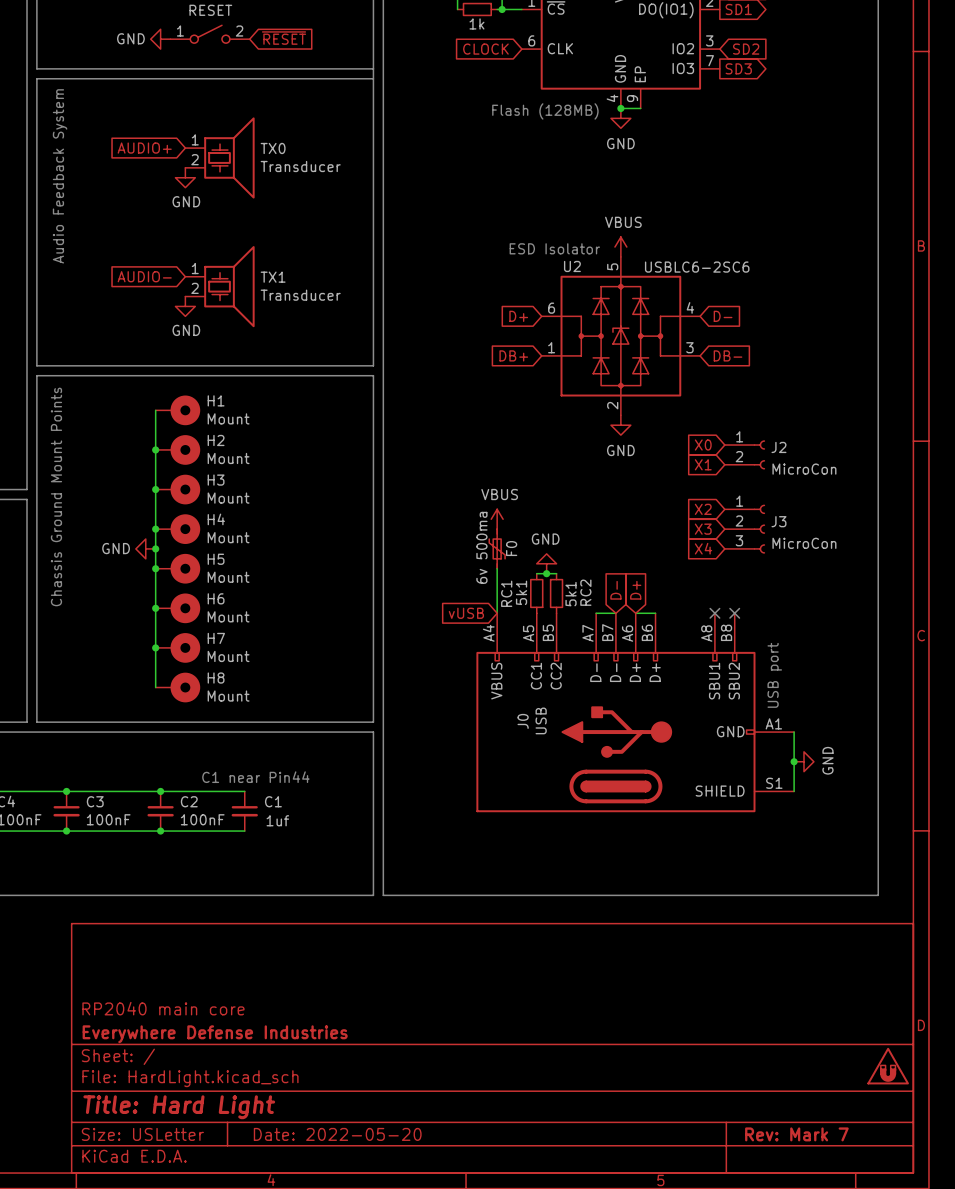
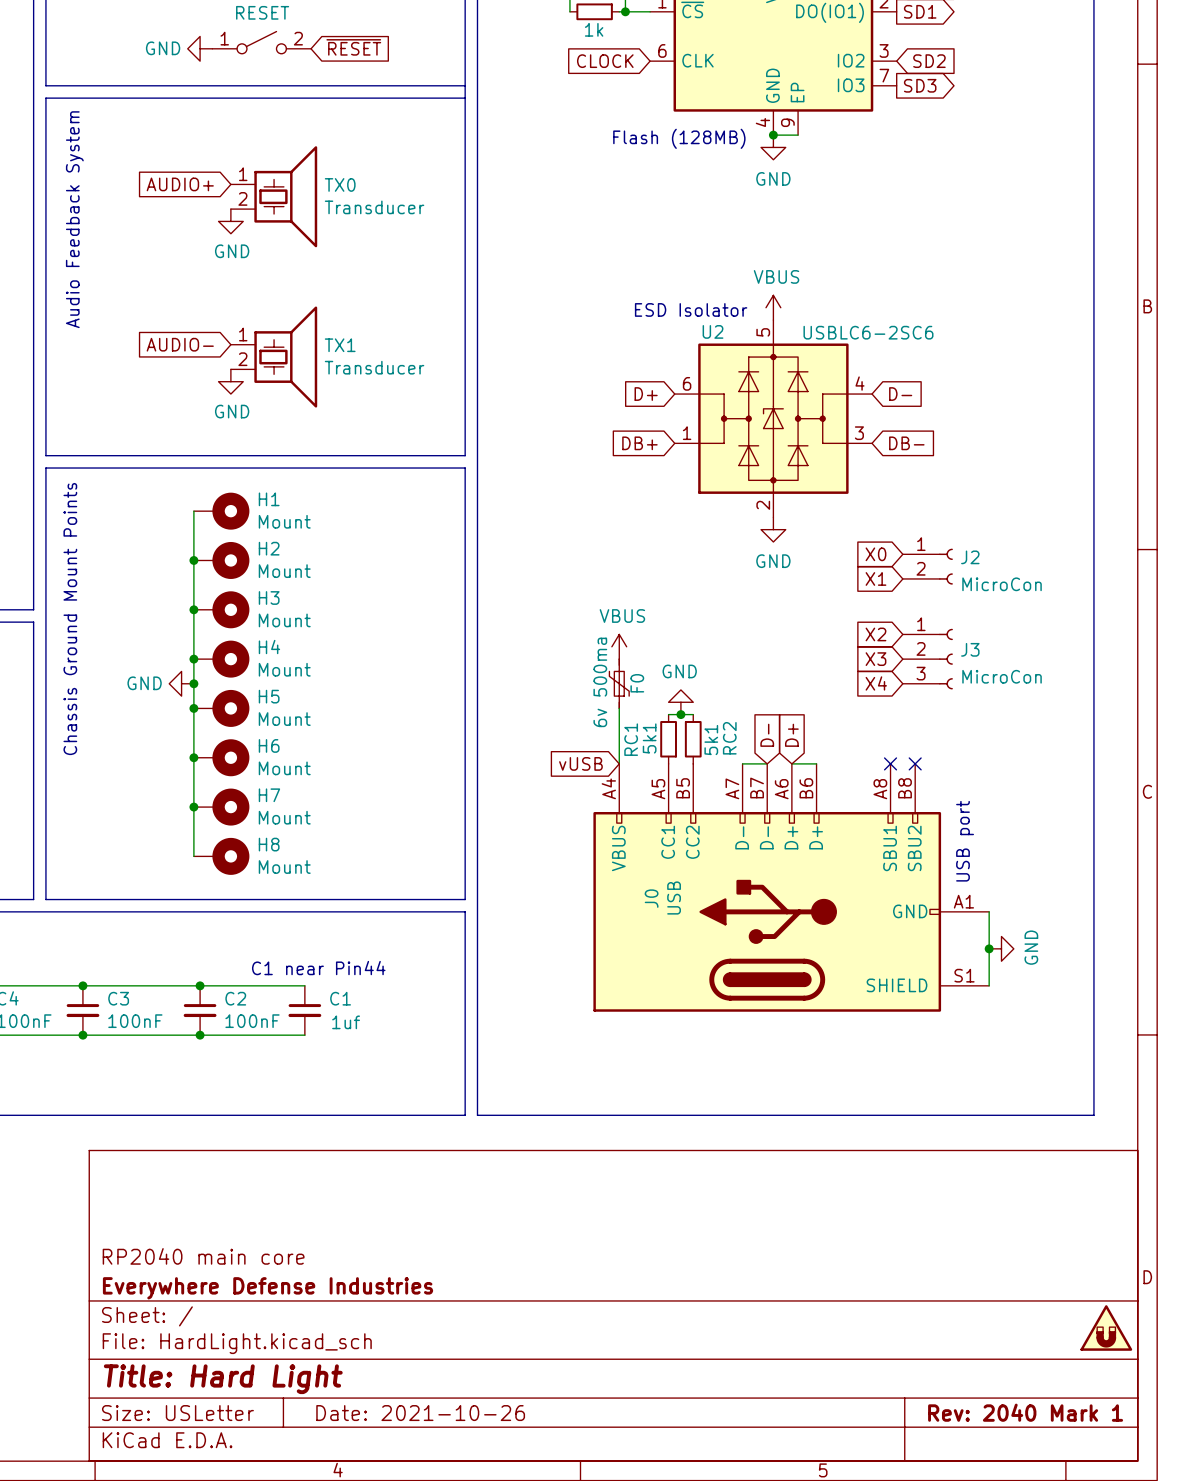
title block: Date: 2022-05-20 (337, 1134) -> Date: 2021-10-26 (420, 1413)
title block: Rev: Mark 7 (796, 1134) -> Rev: 2040 Mark 1 (1025, 1412)

